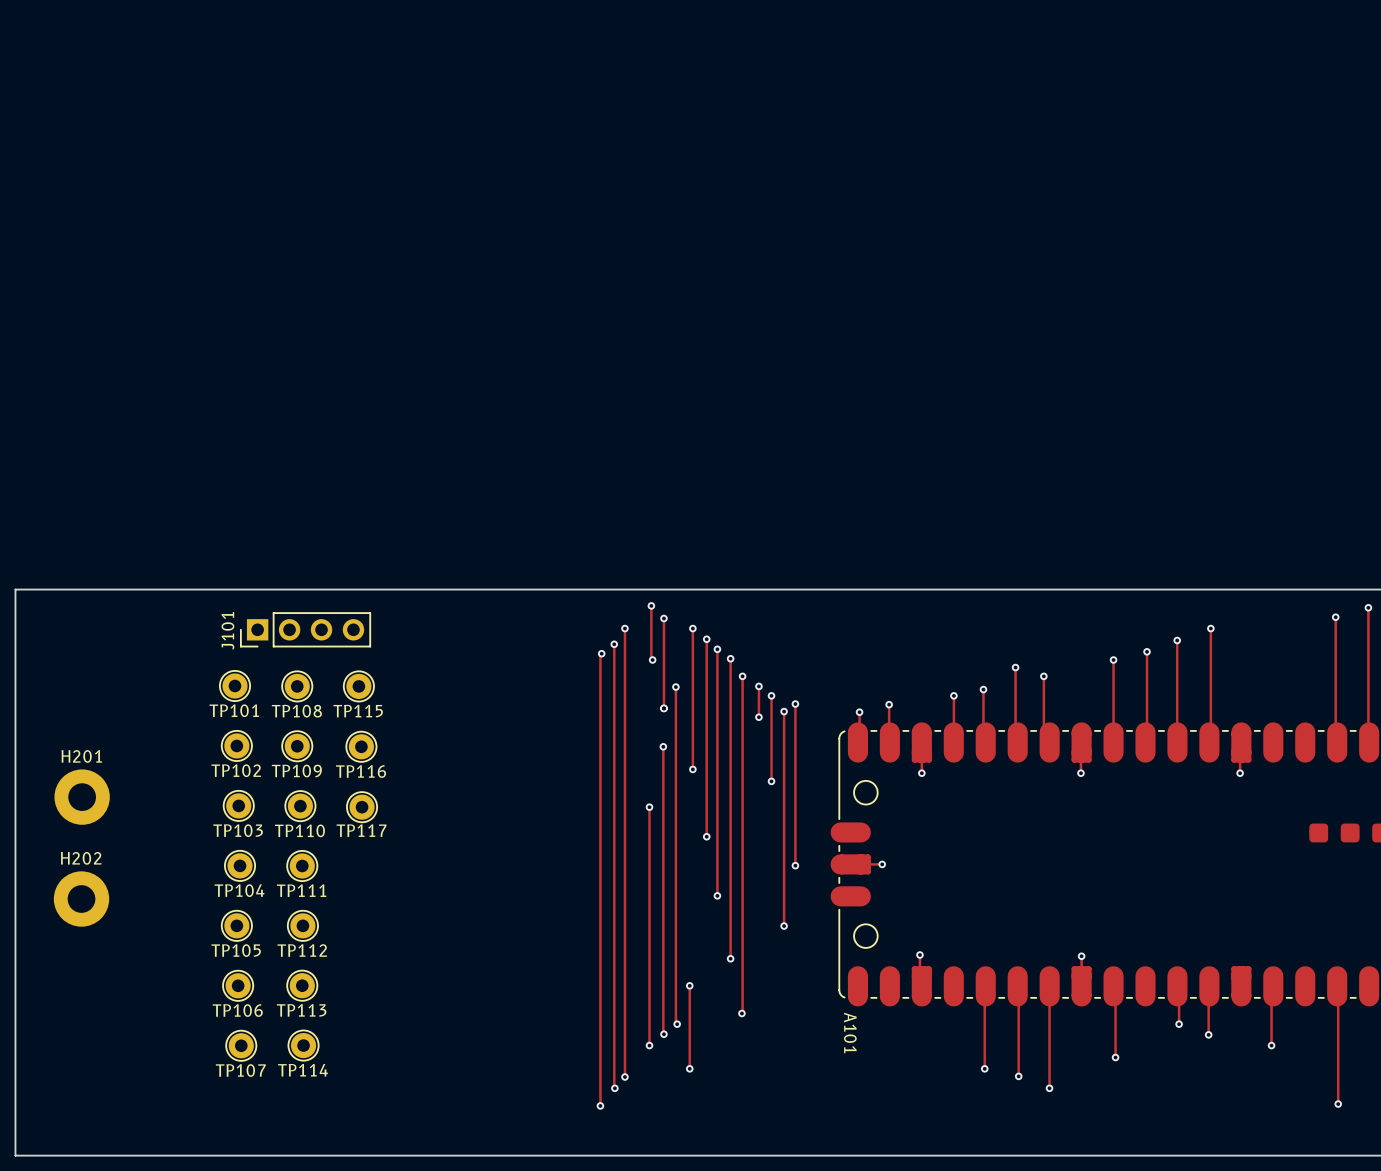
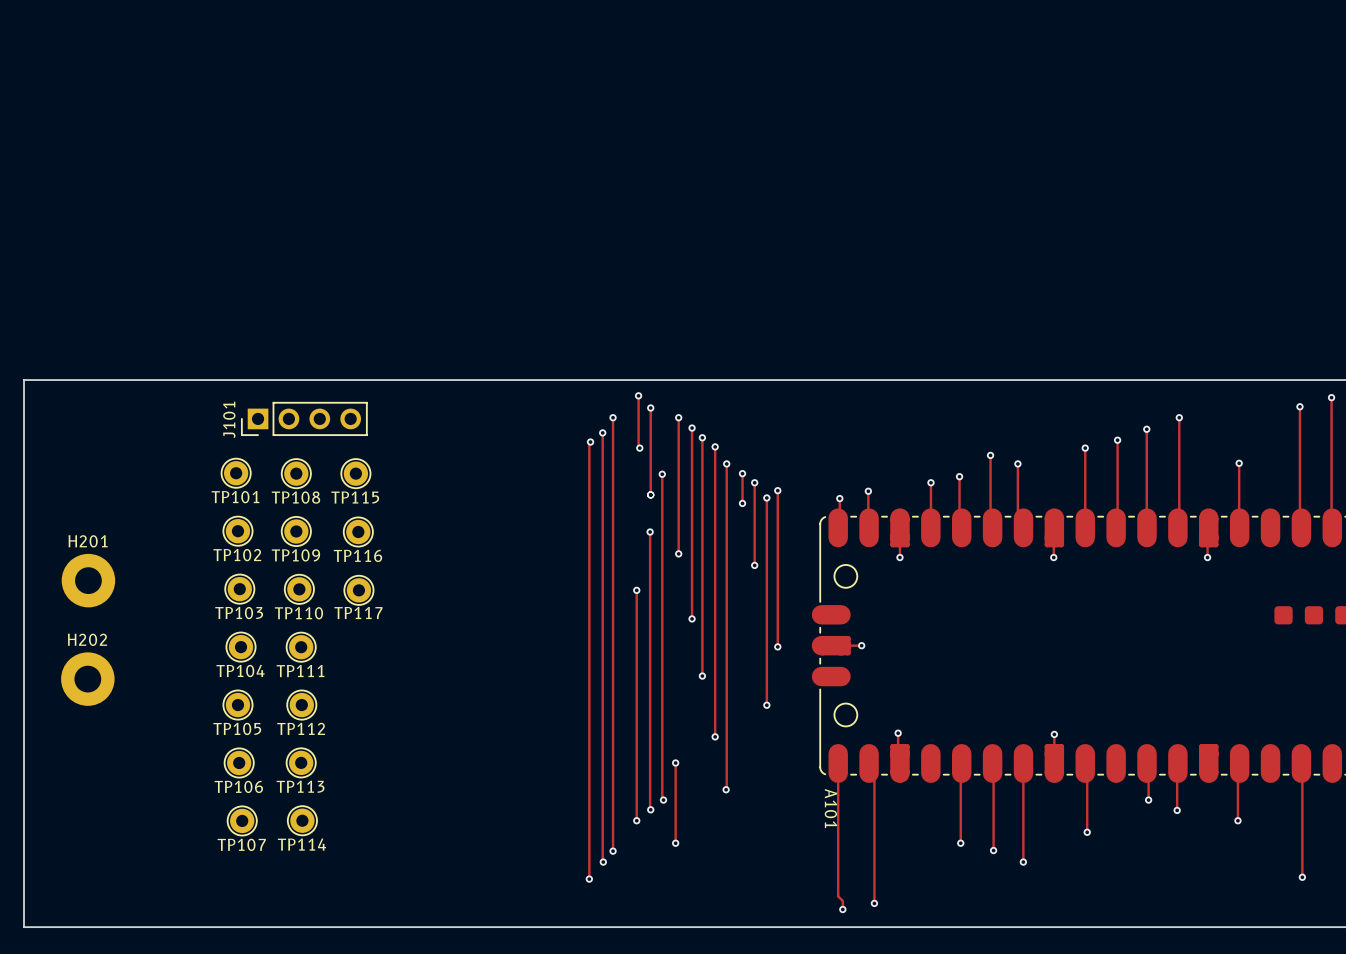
track: none -> (1239, 463) (1239, 537)
via: none -> (1239, 463)
track: none -> (838, 753) (838, 896) (842, 900) (842, 909)
track: none -> (869, 753) (874, 759) (874, 903)
via: none -> (874, 903)
via: none -> (842, 909)

